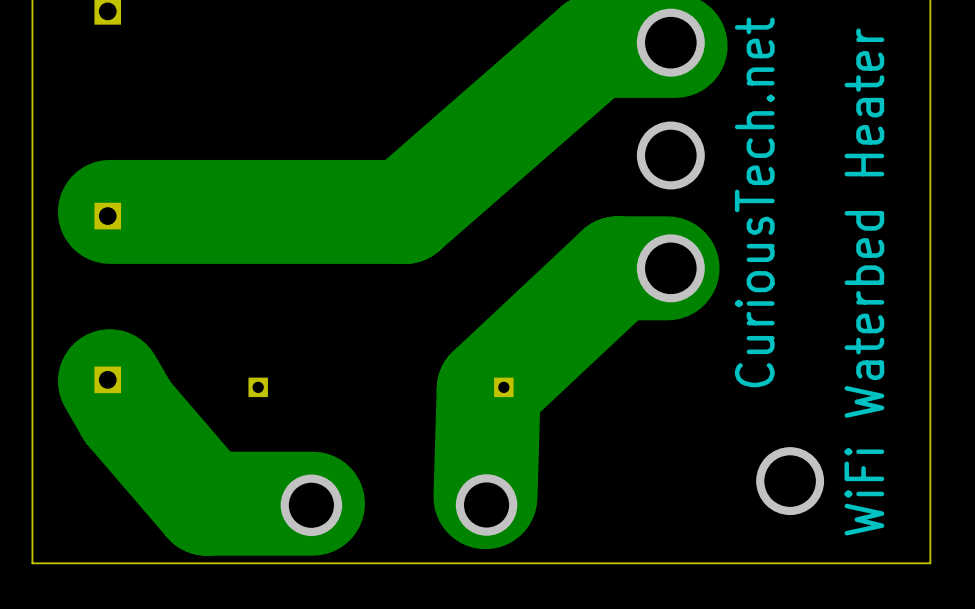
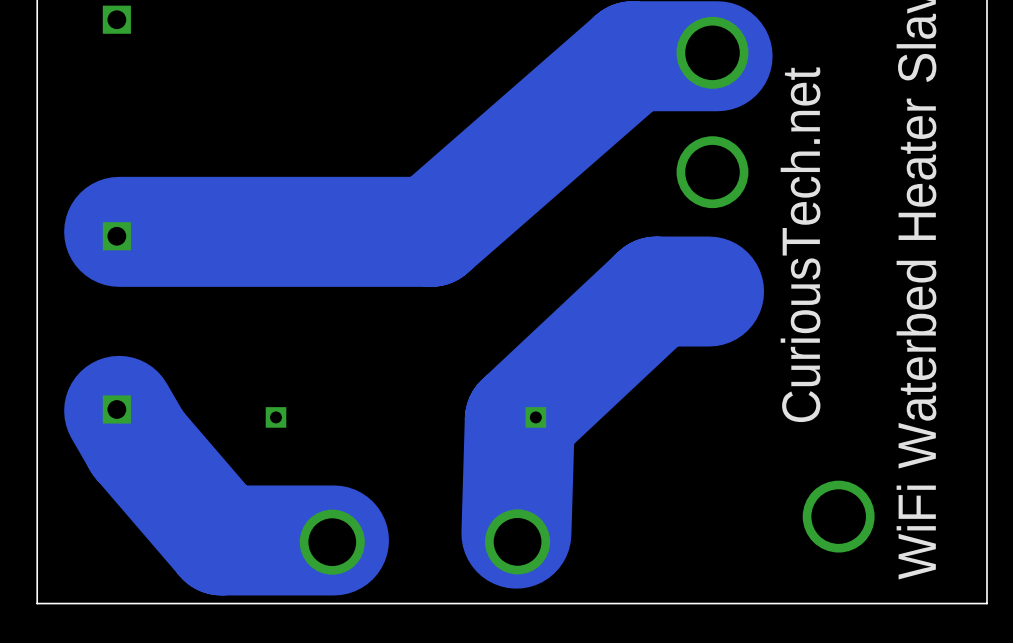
via: (670, 268) -> none

